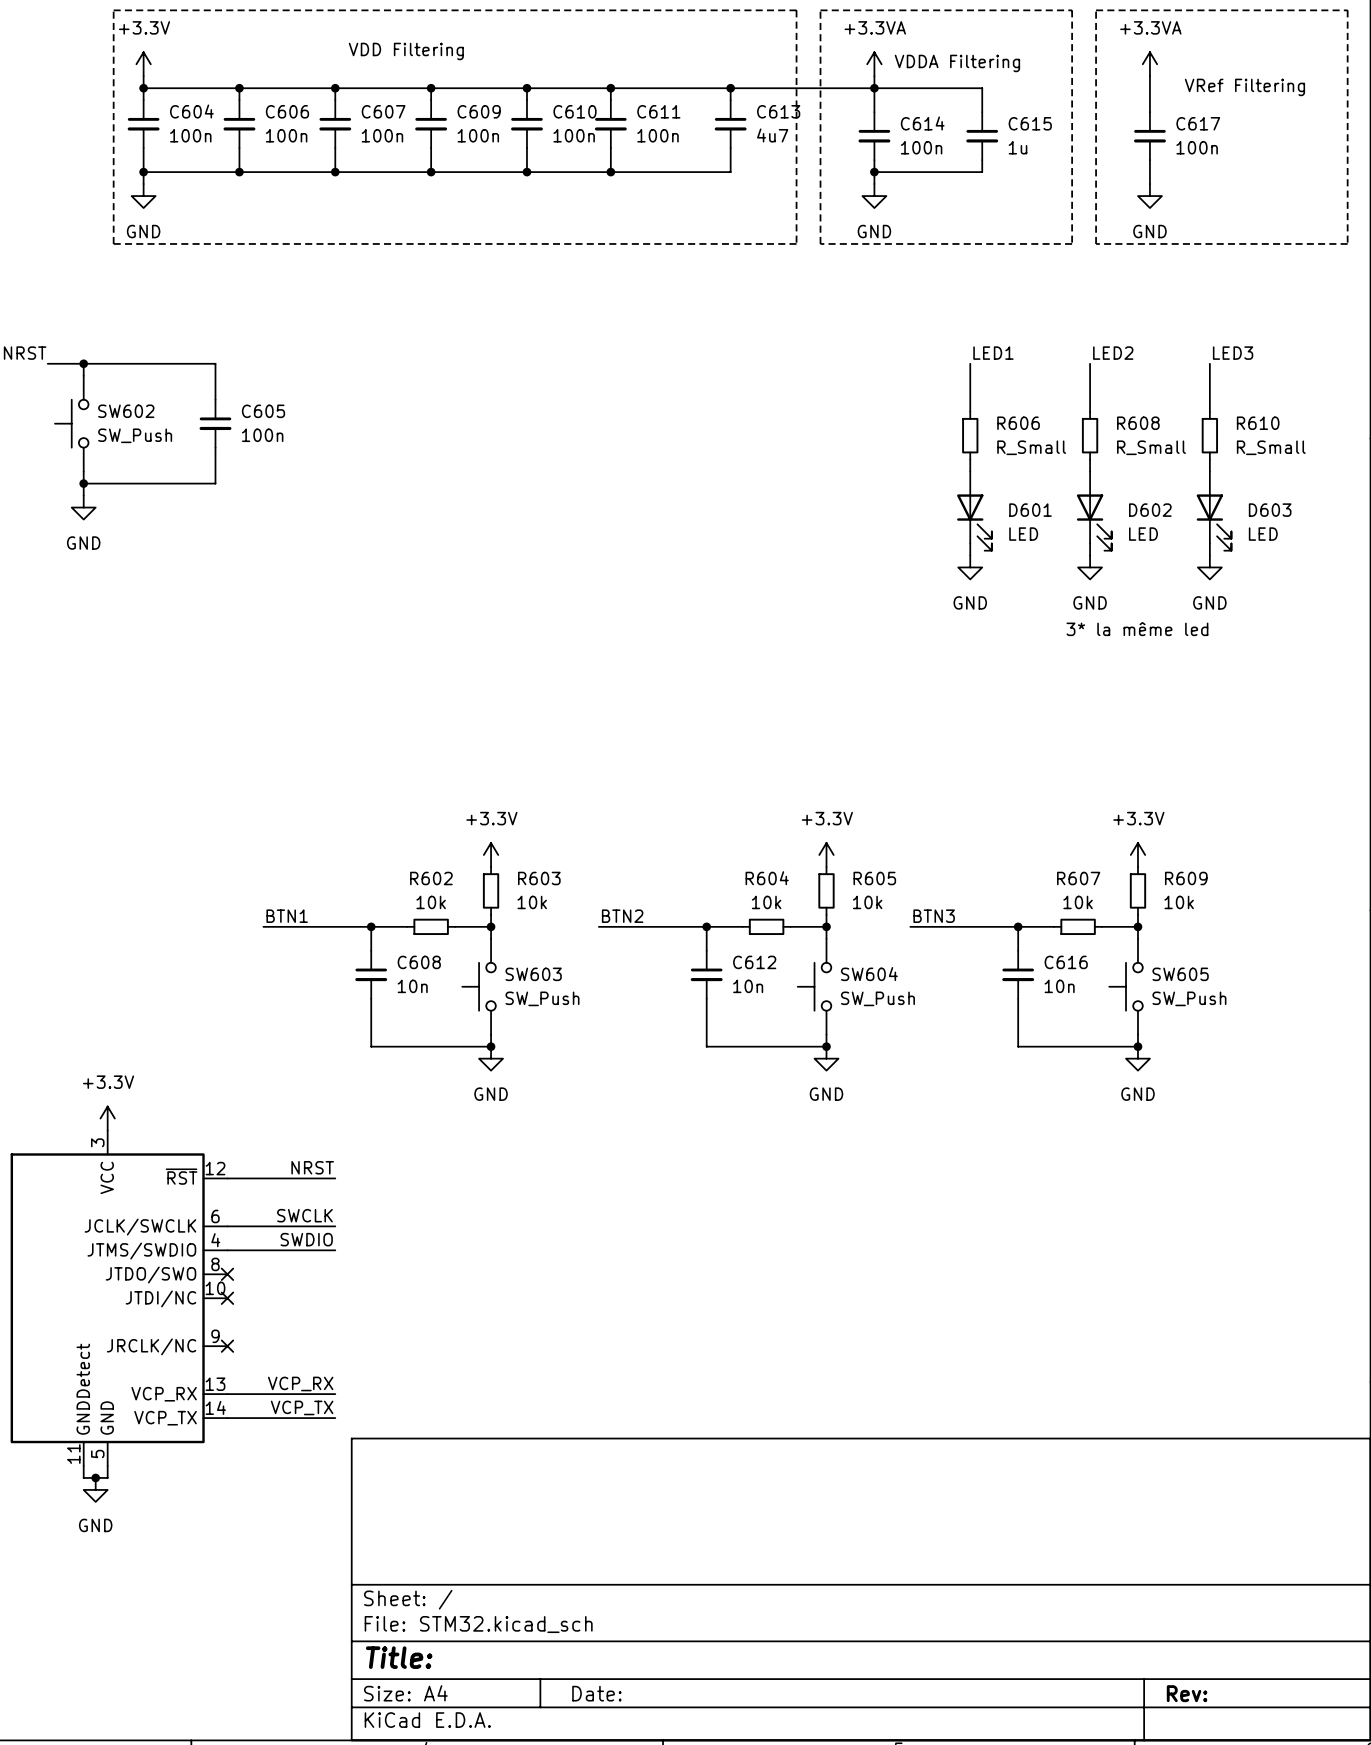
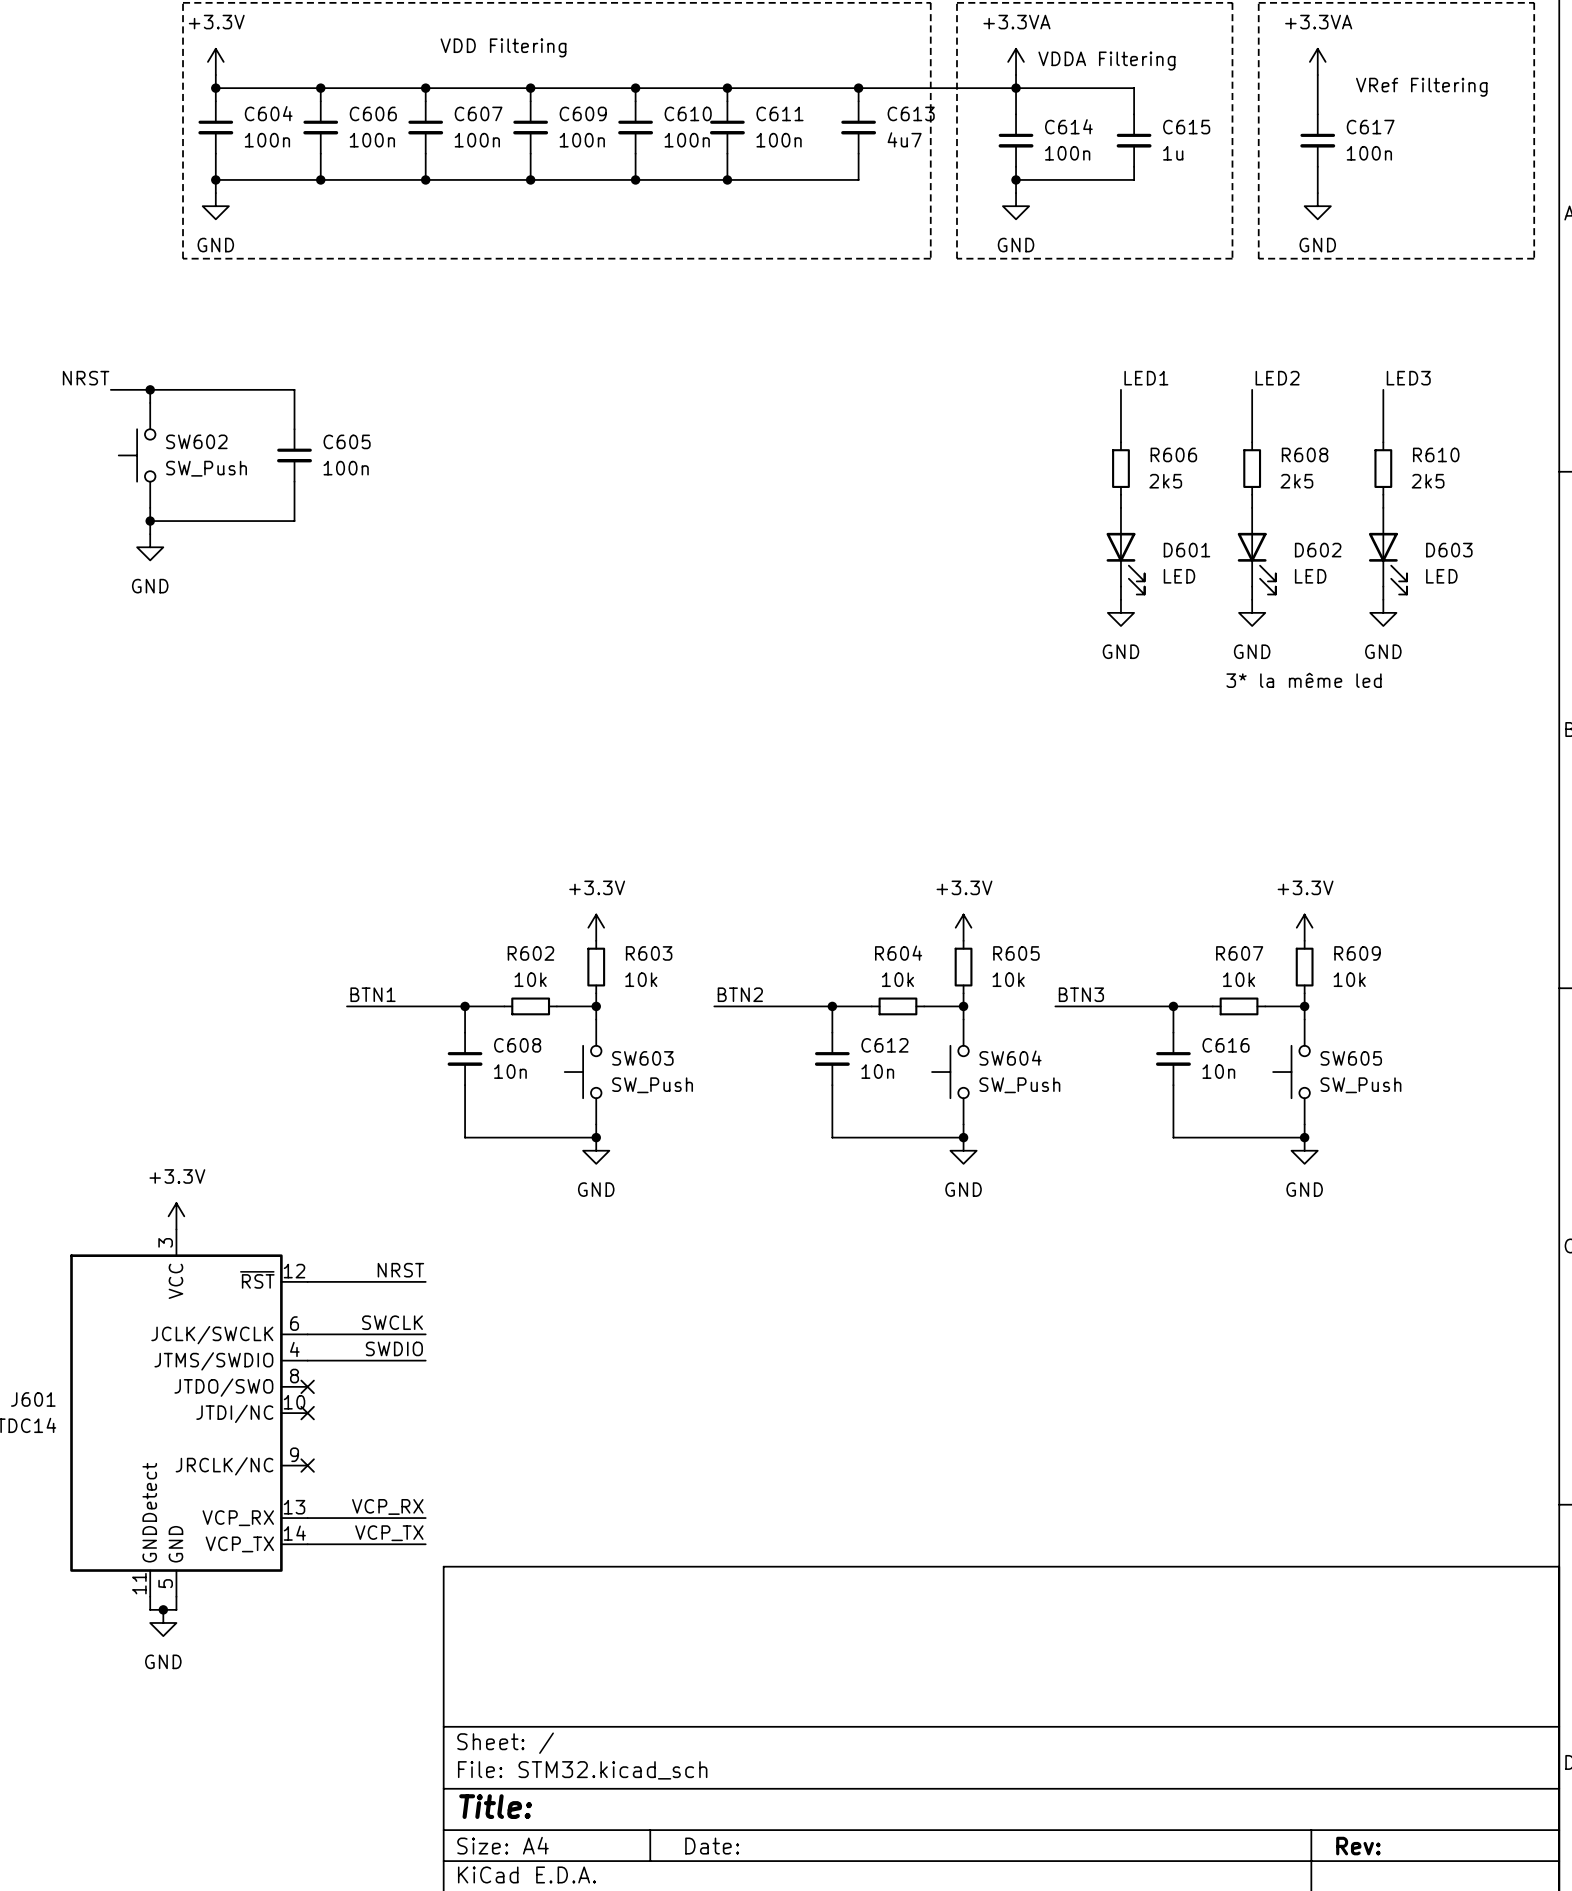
R606 value: R_Small (1031, 447) -> 2k5 (1165, 481)
R608 value: R_Small (1151, 447) -> 2k5 (1296, 481)
R610 value: R_Small (1271, 447) -> 2k5 (1428, 481)

